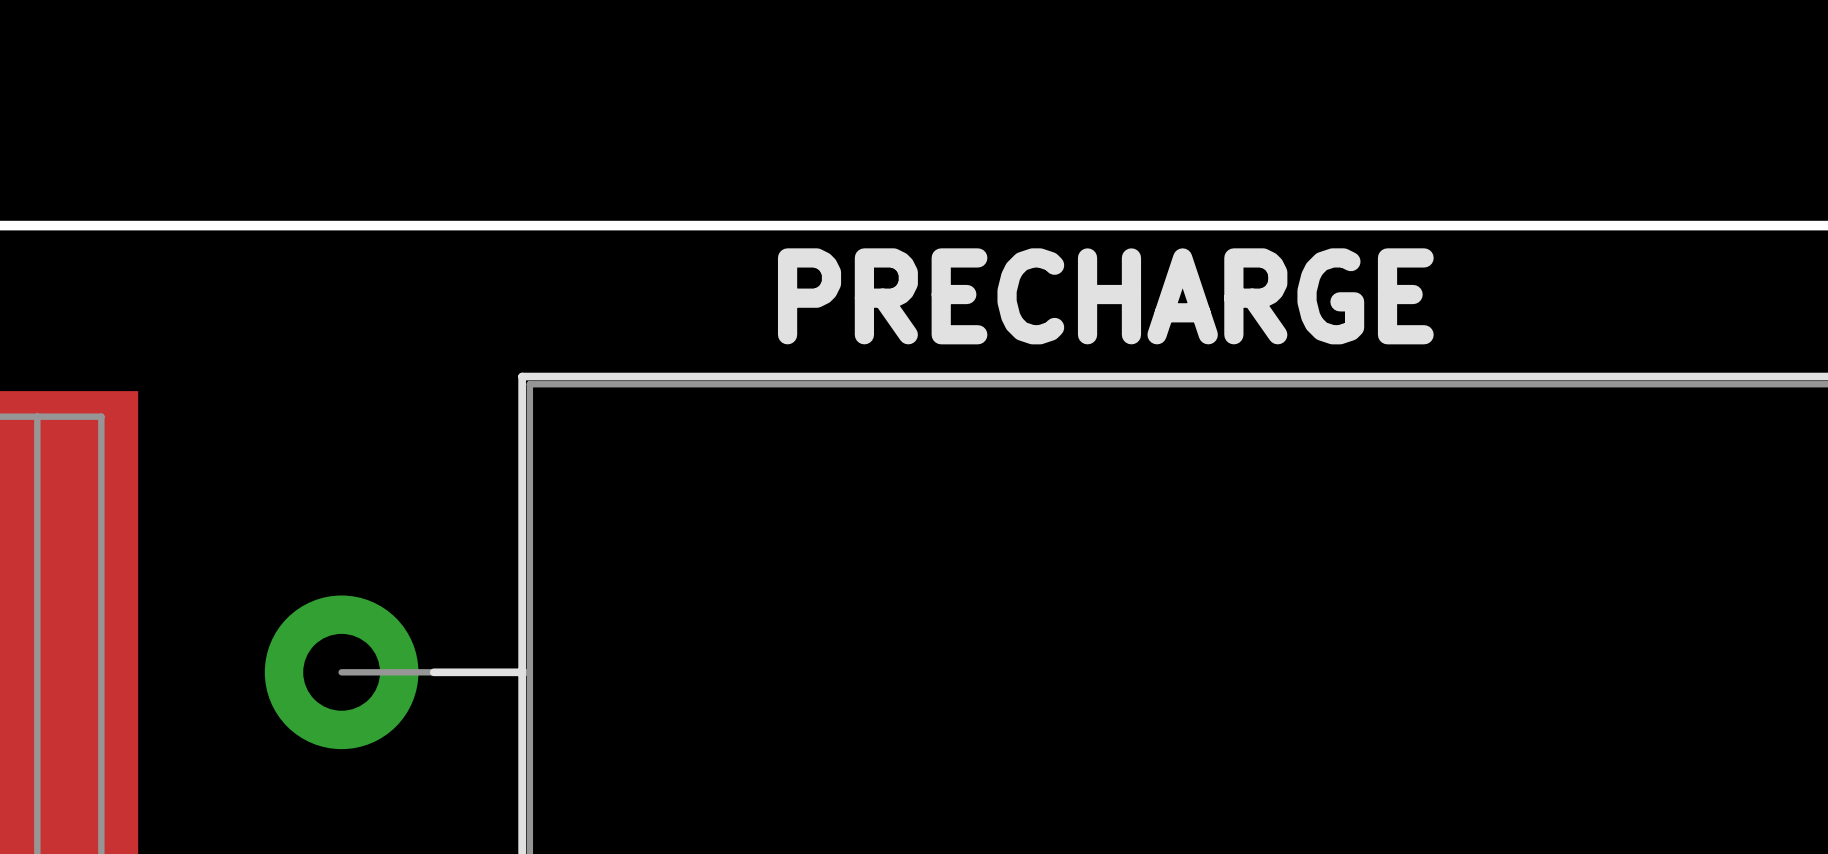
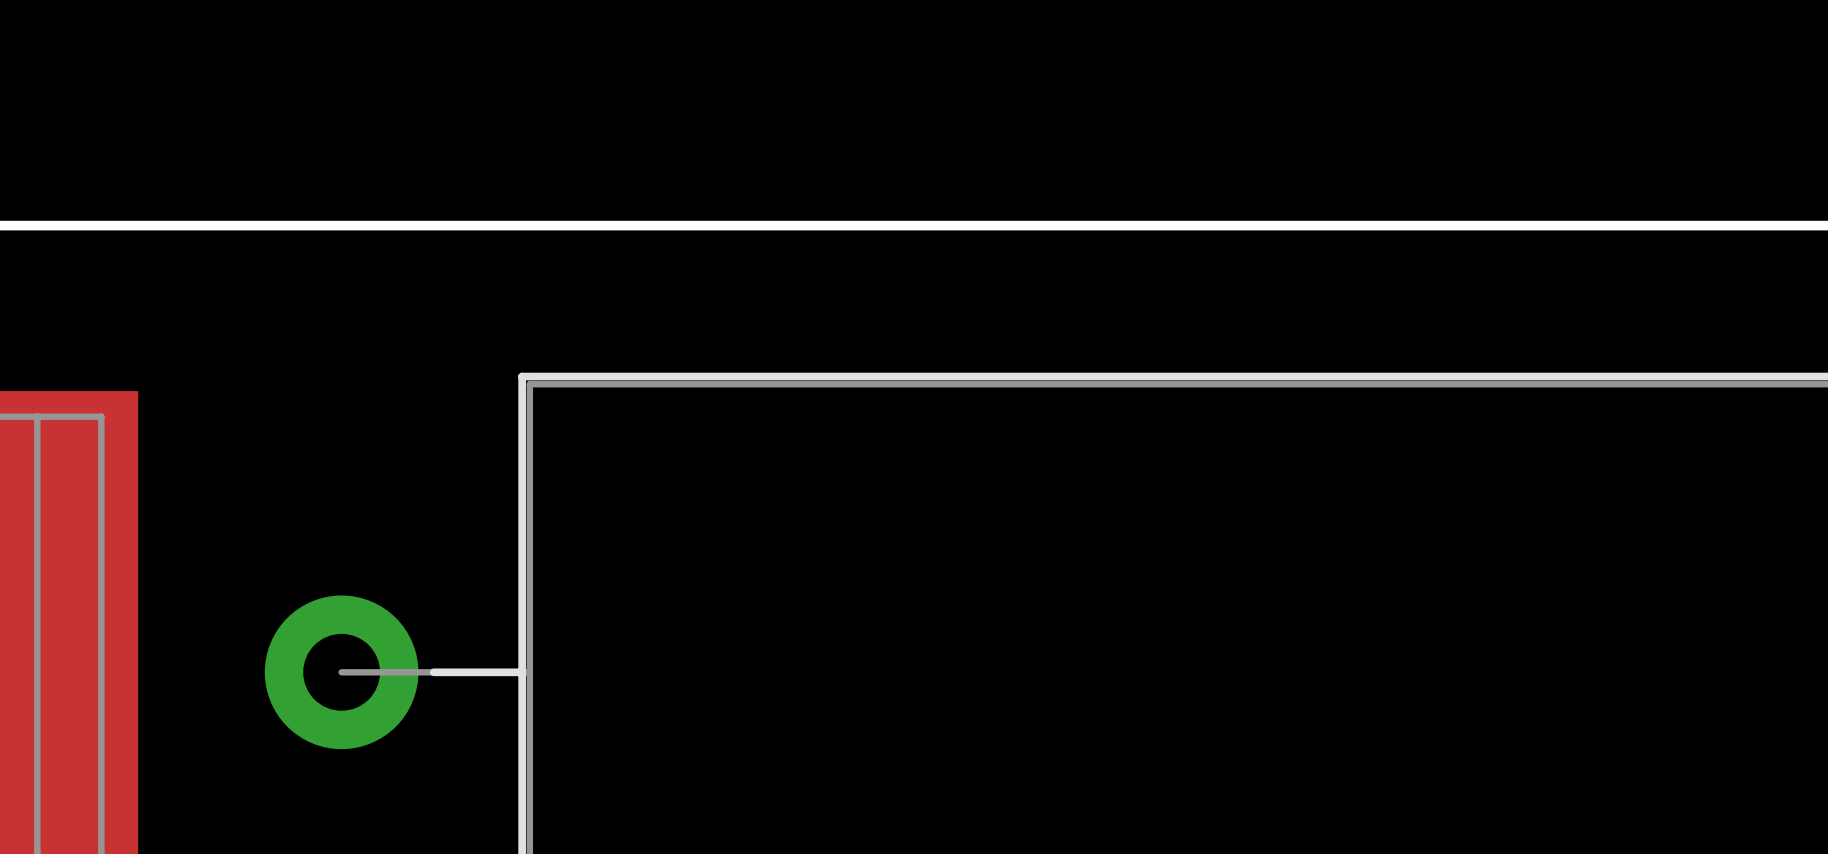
text: PRECHARGE (1105, 296) -> none

